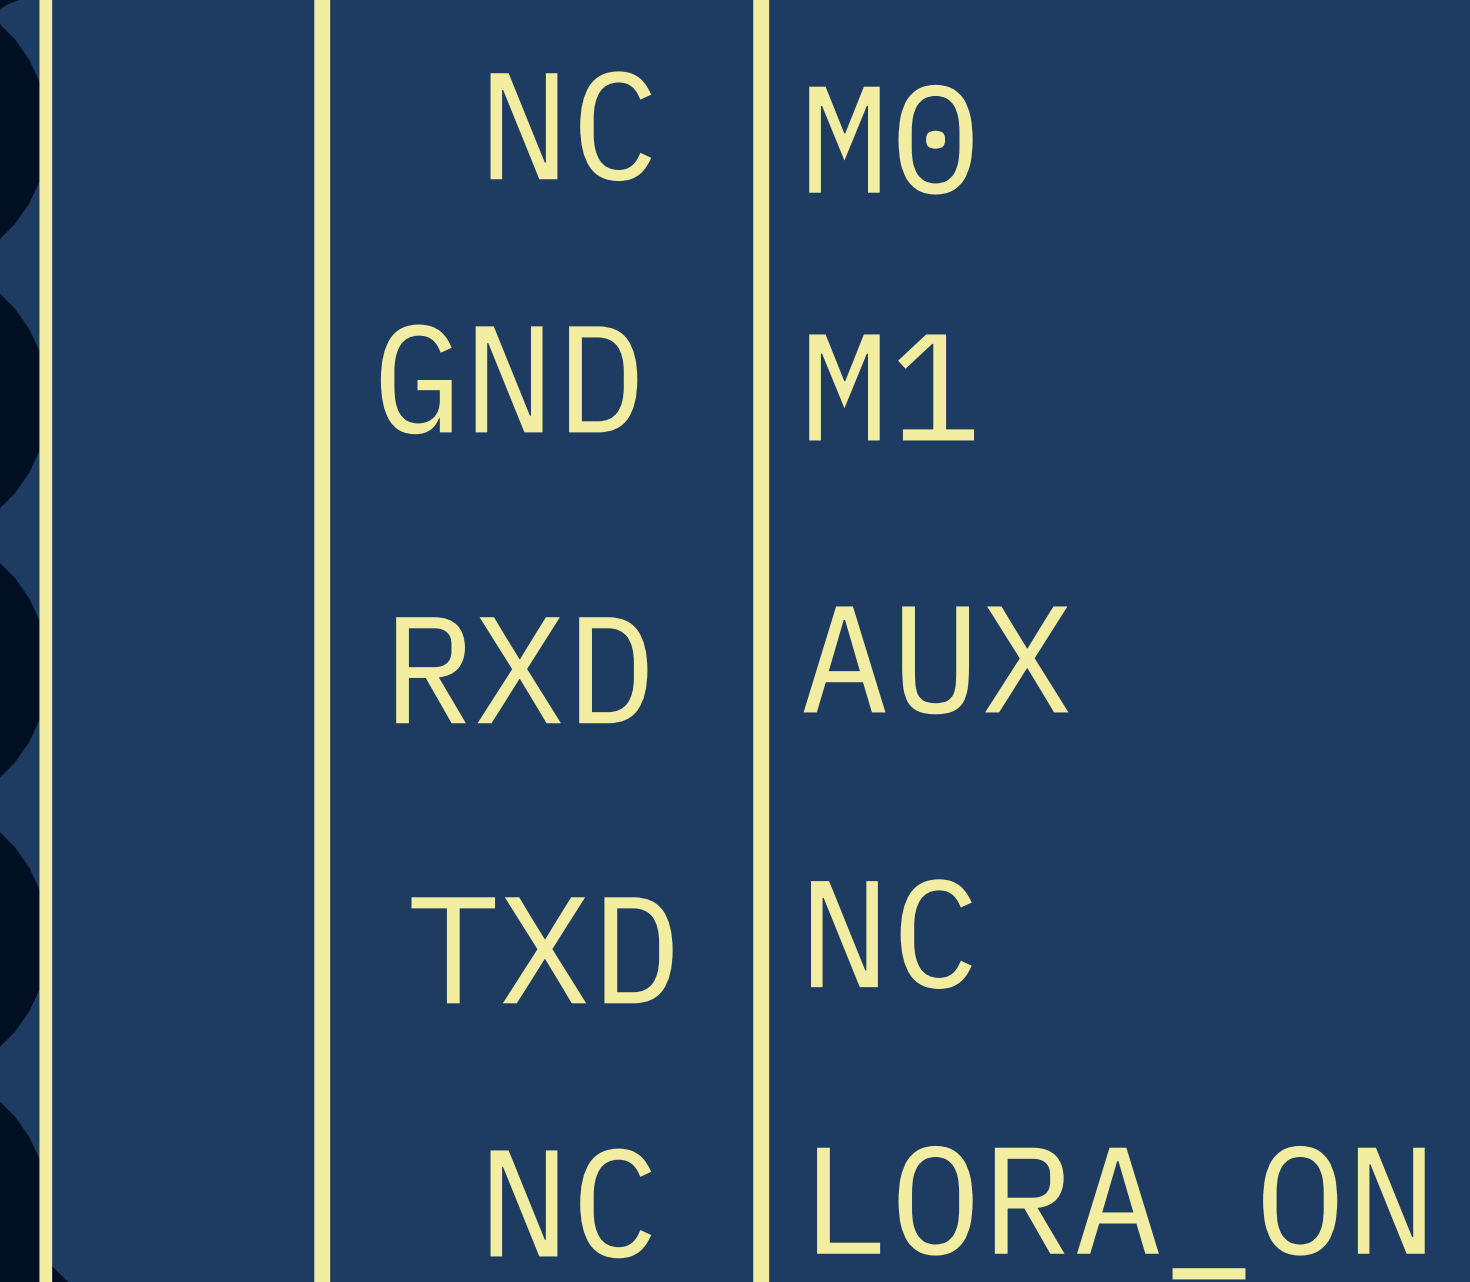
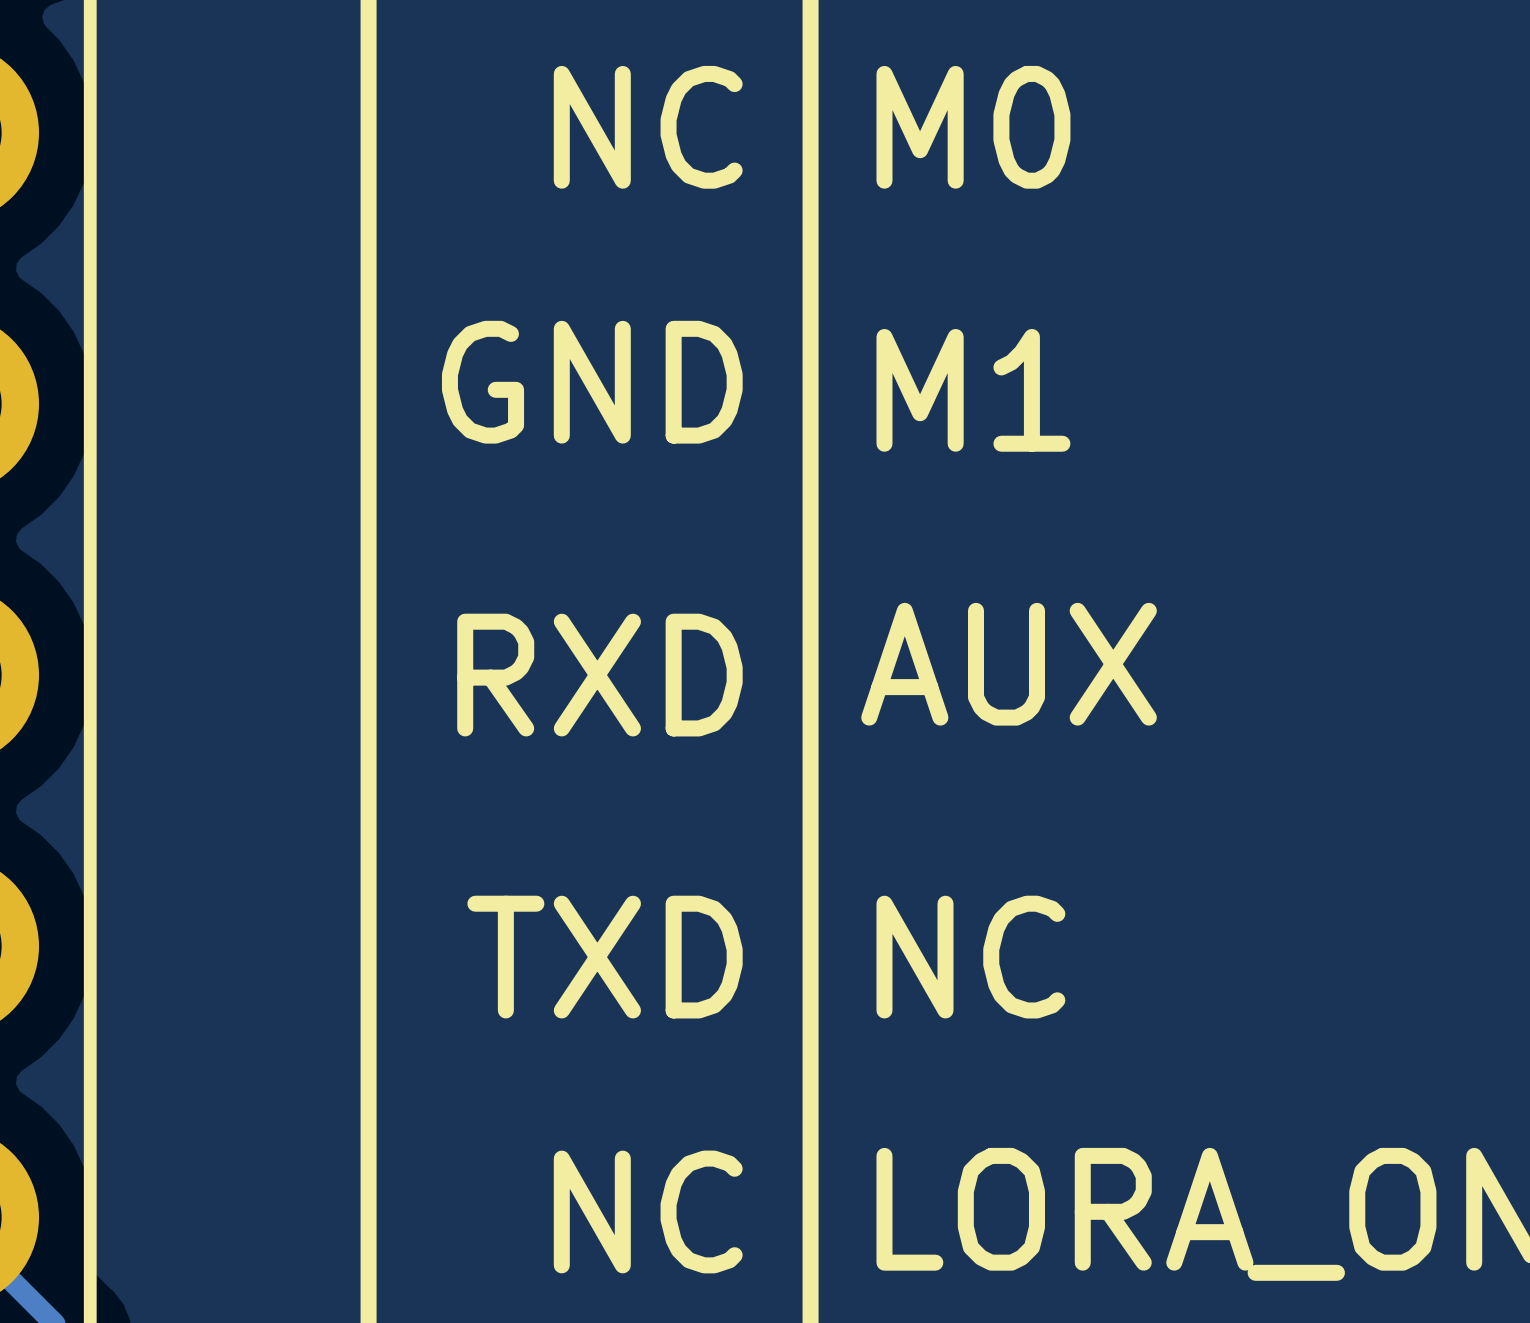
text position: M0 (890, 139) -> M0 (973, 127)
text position: NC (891, 934) -> NC (970, 957)

